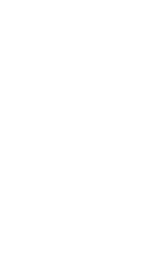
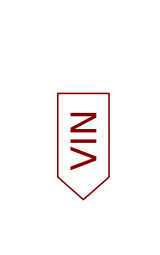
global label: none -> VIN (83, 141)

